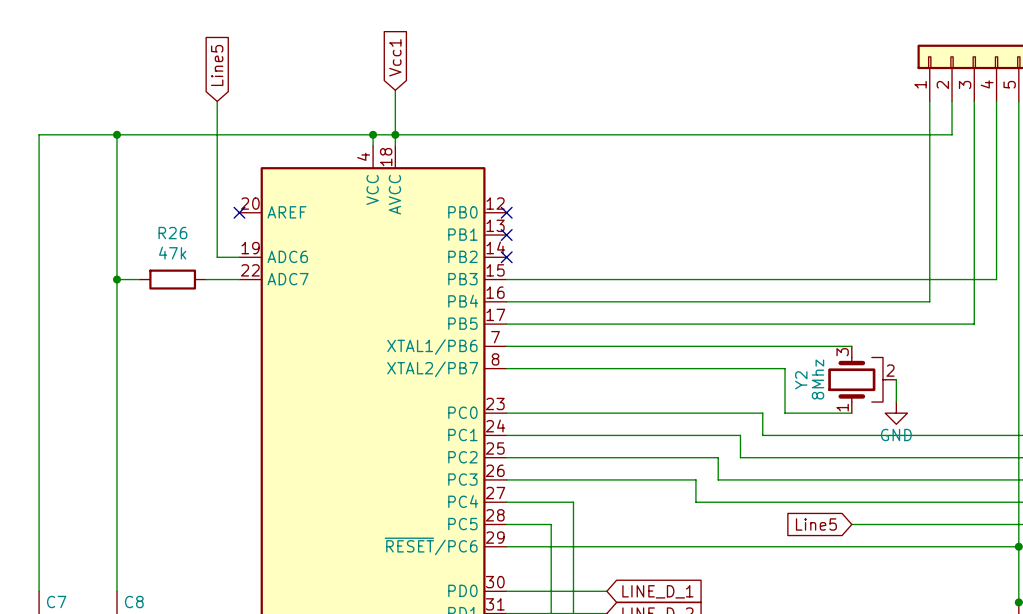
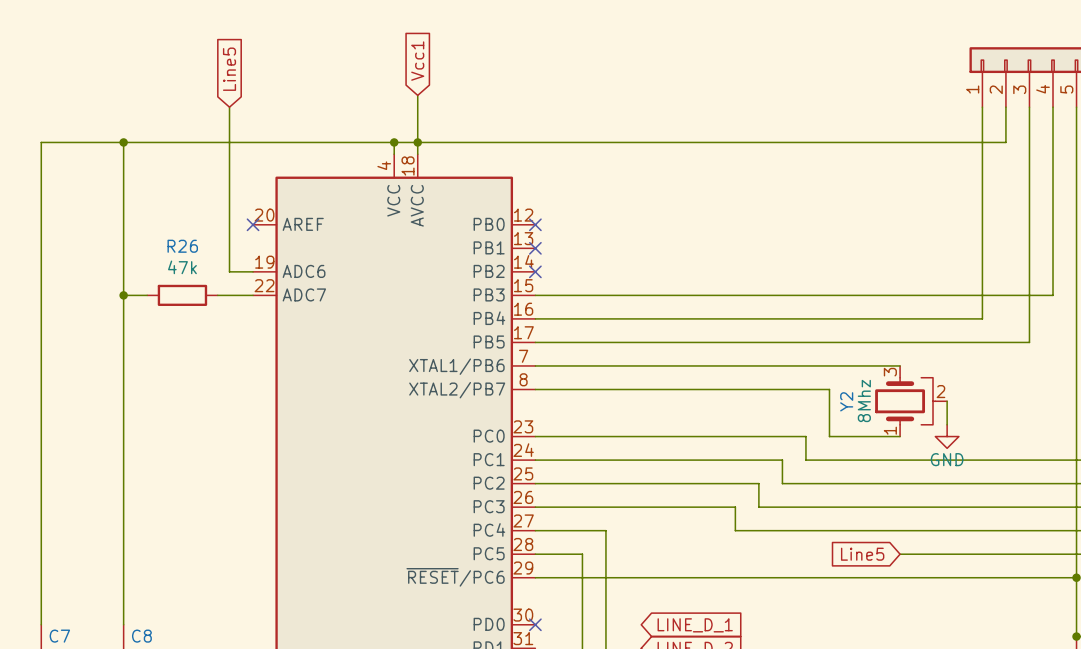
wire: (506, 591) (606, 591) -> none
no-connect mark: none -> (535, 624)
wire: (506, 613) (606, 613) -> none

